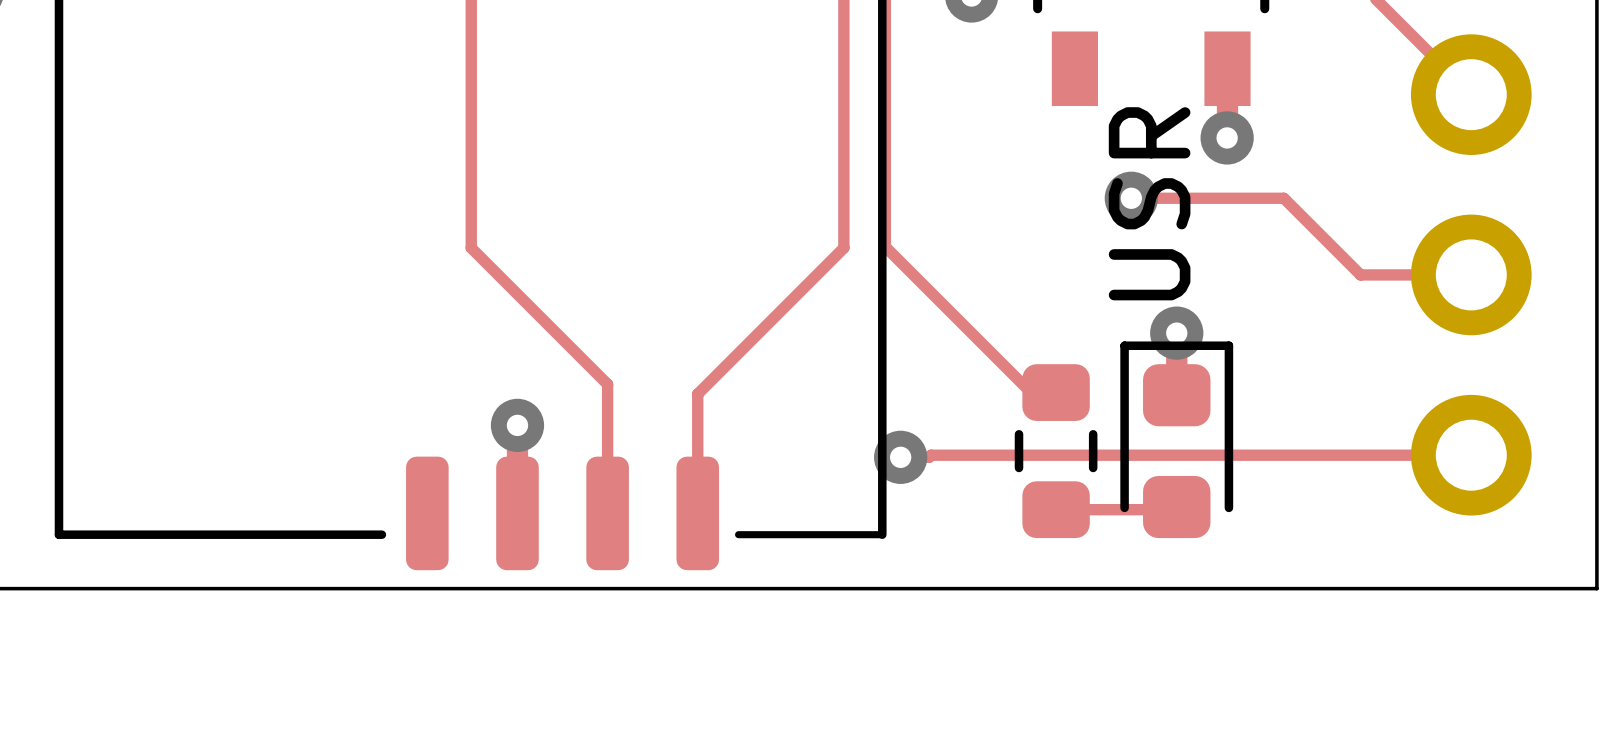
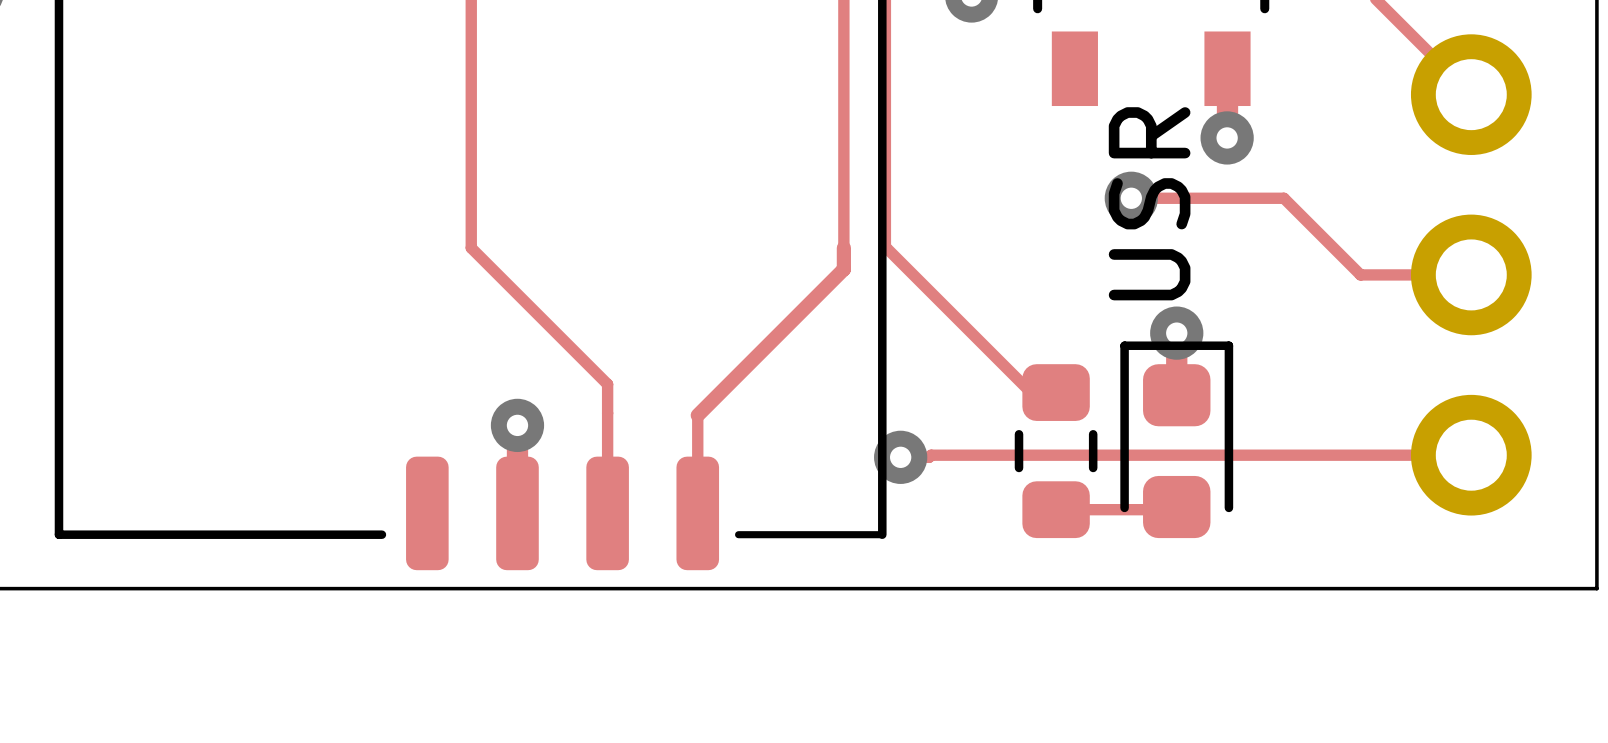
track: (843, 247) (697, 394) (697, 415) -> (843, 247) (843, 269) (697, 415)

